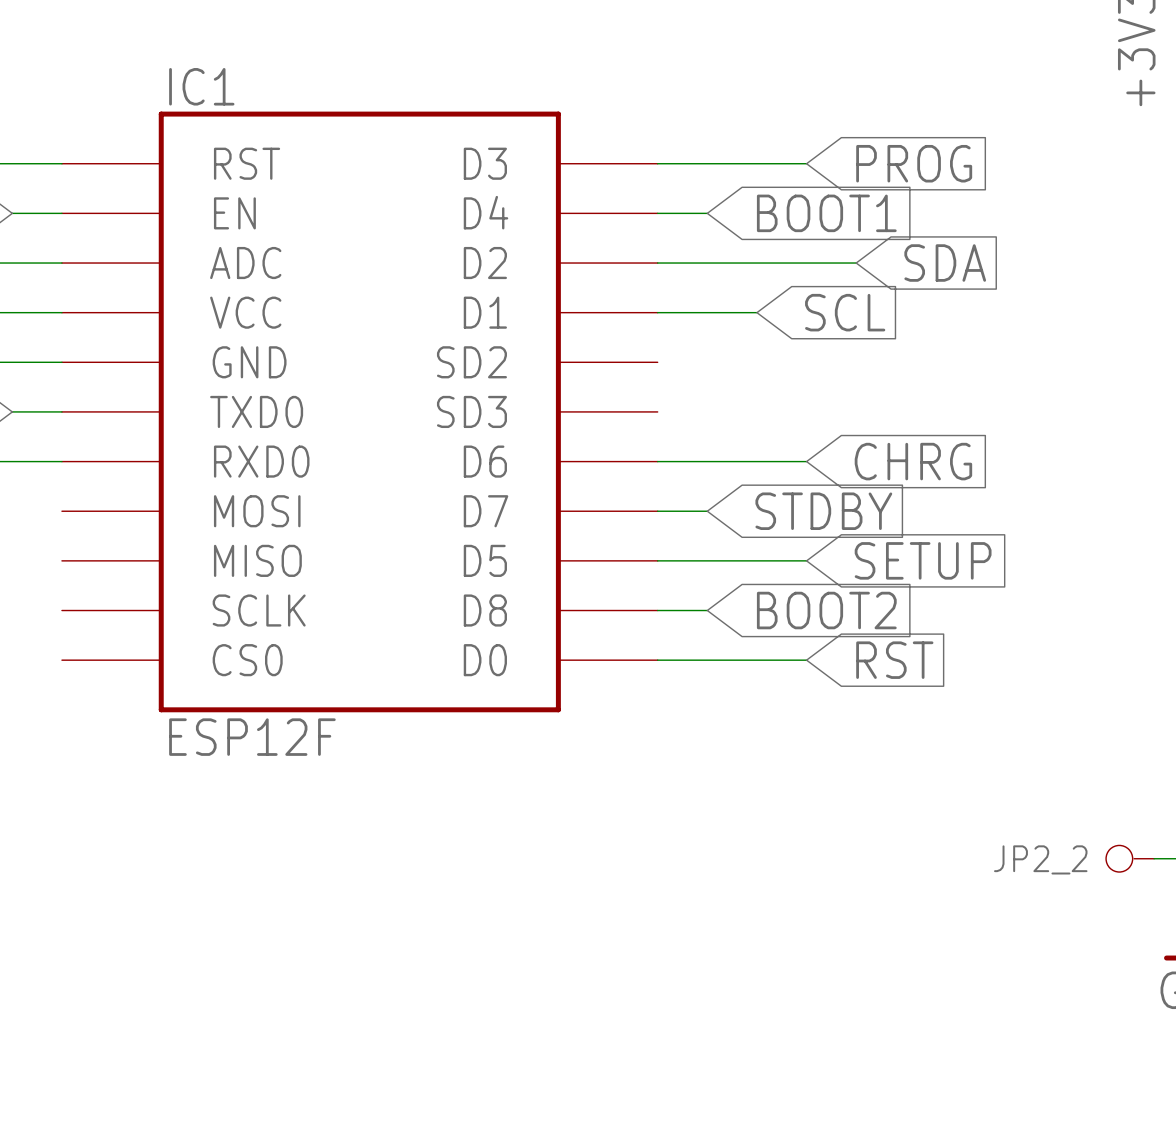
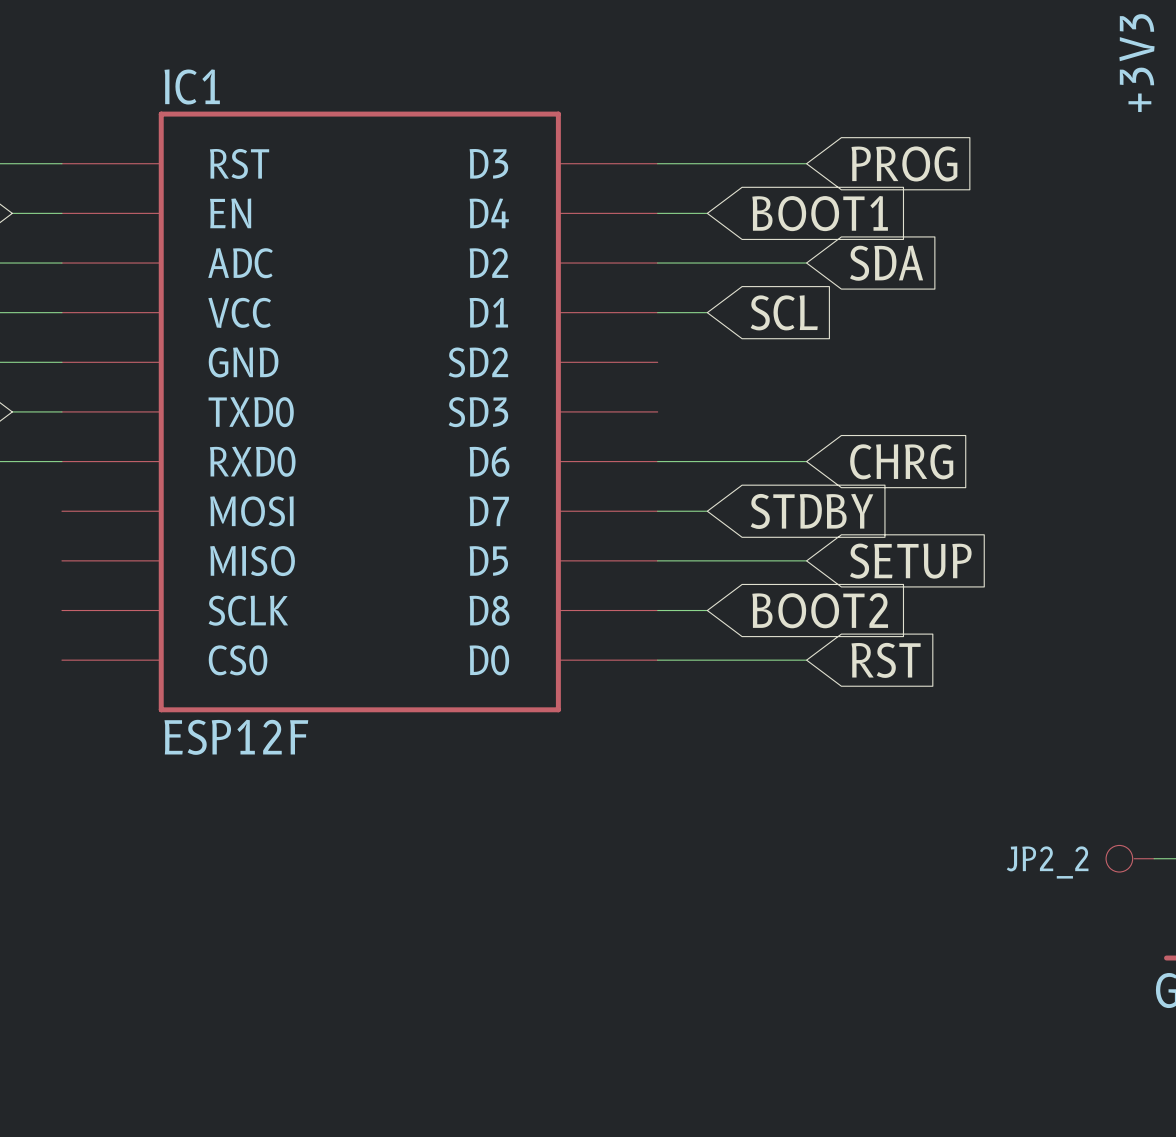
wire: (806, 263) (856, 263) -> none
global label position: SDA (945, 263) -> SDA (886, 263)
wire: (707, 312) (756, 312) -> none
global label position: SCL (845, 312) -> SCL (784, 312)

